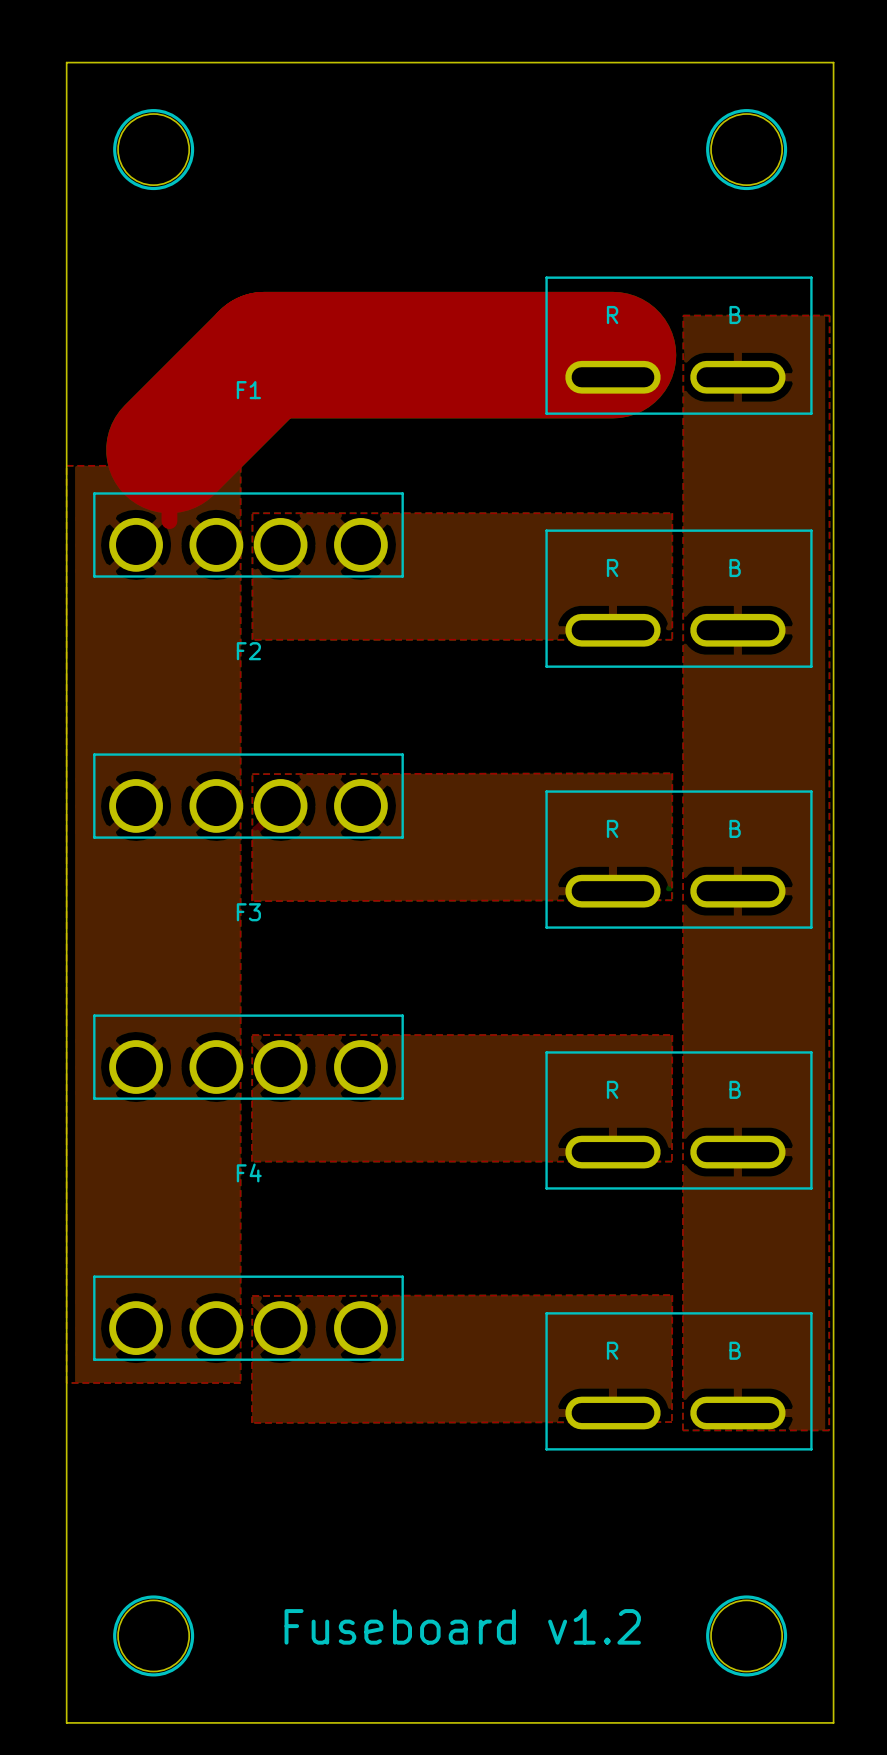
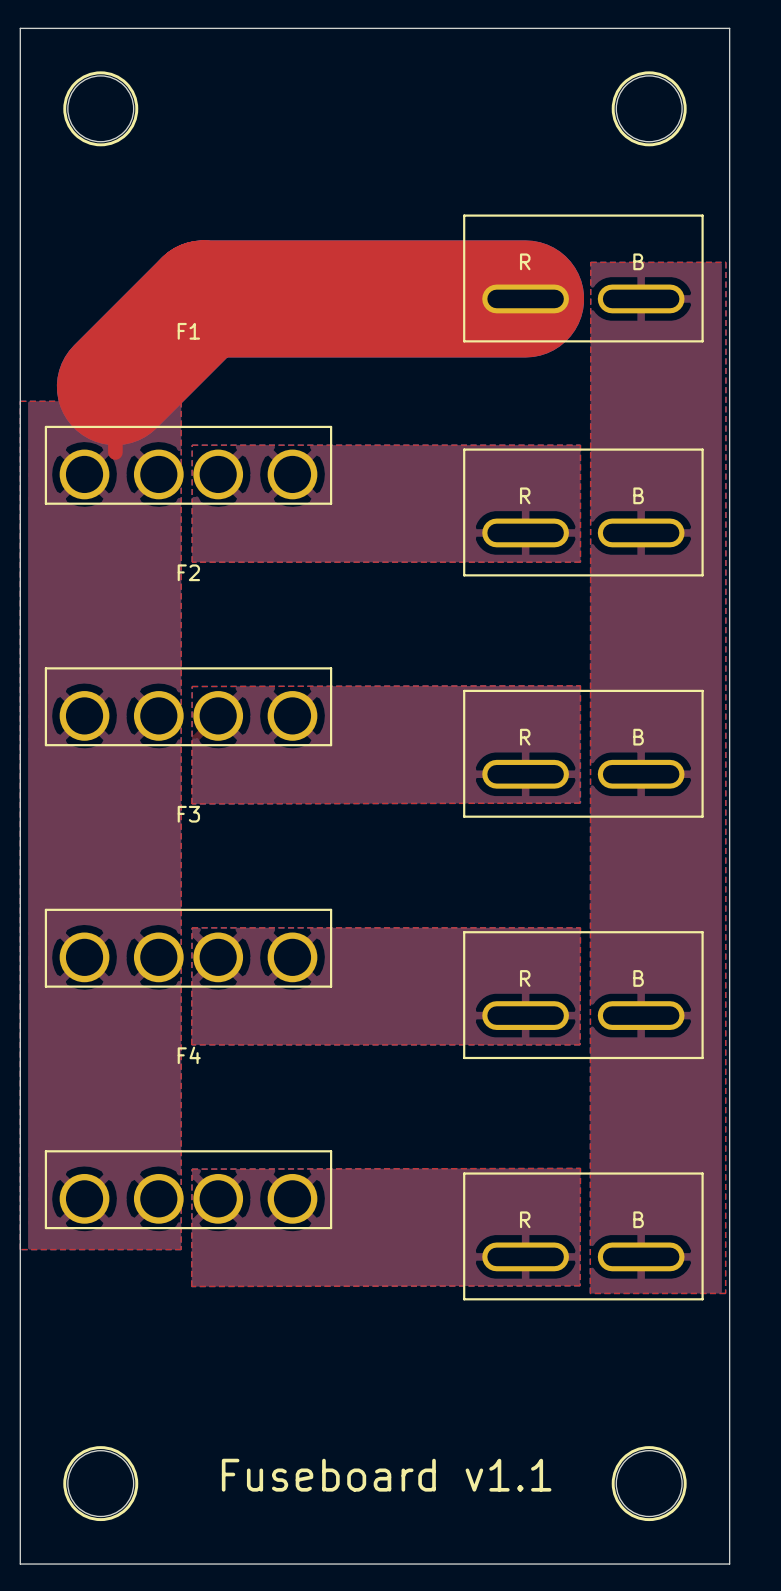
part footprint: [545, 276, 813, 415] -> [463, 214, 704, 343]
part footprint: [545, 529, 813, 668] -> [463, 448, 704, 577]
part footprint: [545, 790, 813, 929] -> [463, 689, 704, 818]
part footprint: [545, 1051, 813, 1190] -> [463, 931, 704, 1060]
part footprint: [545, 1312, 813, 1451] -> [463, 1172, 704, 1301]
text: Fuseboard v1.2 (462, 1626) -> Fuseboard v1.1 (386, 1475)

